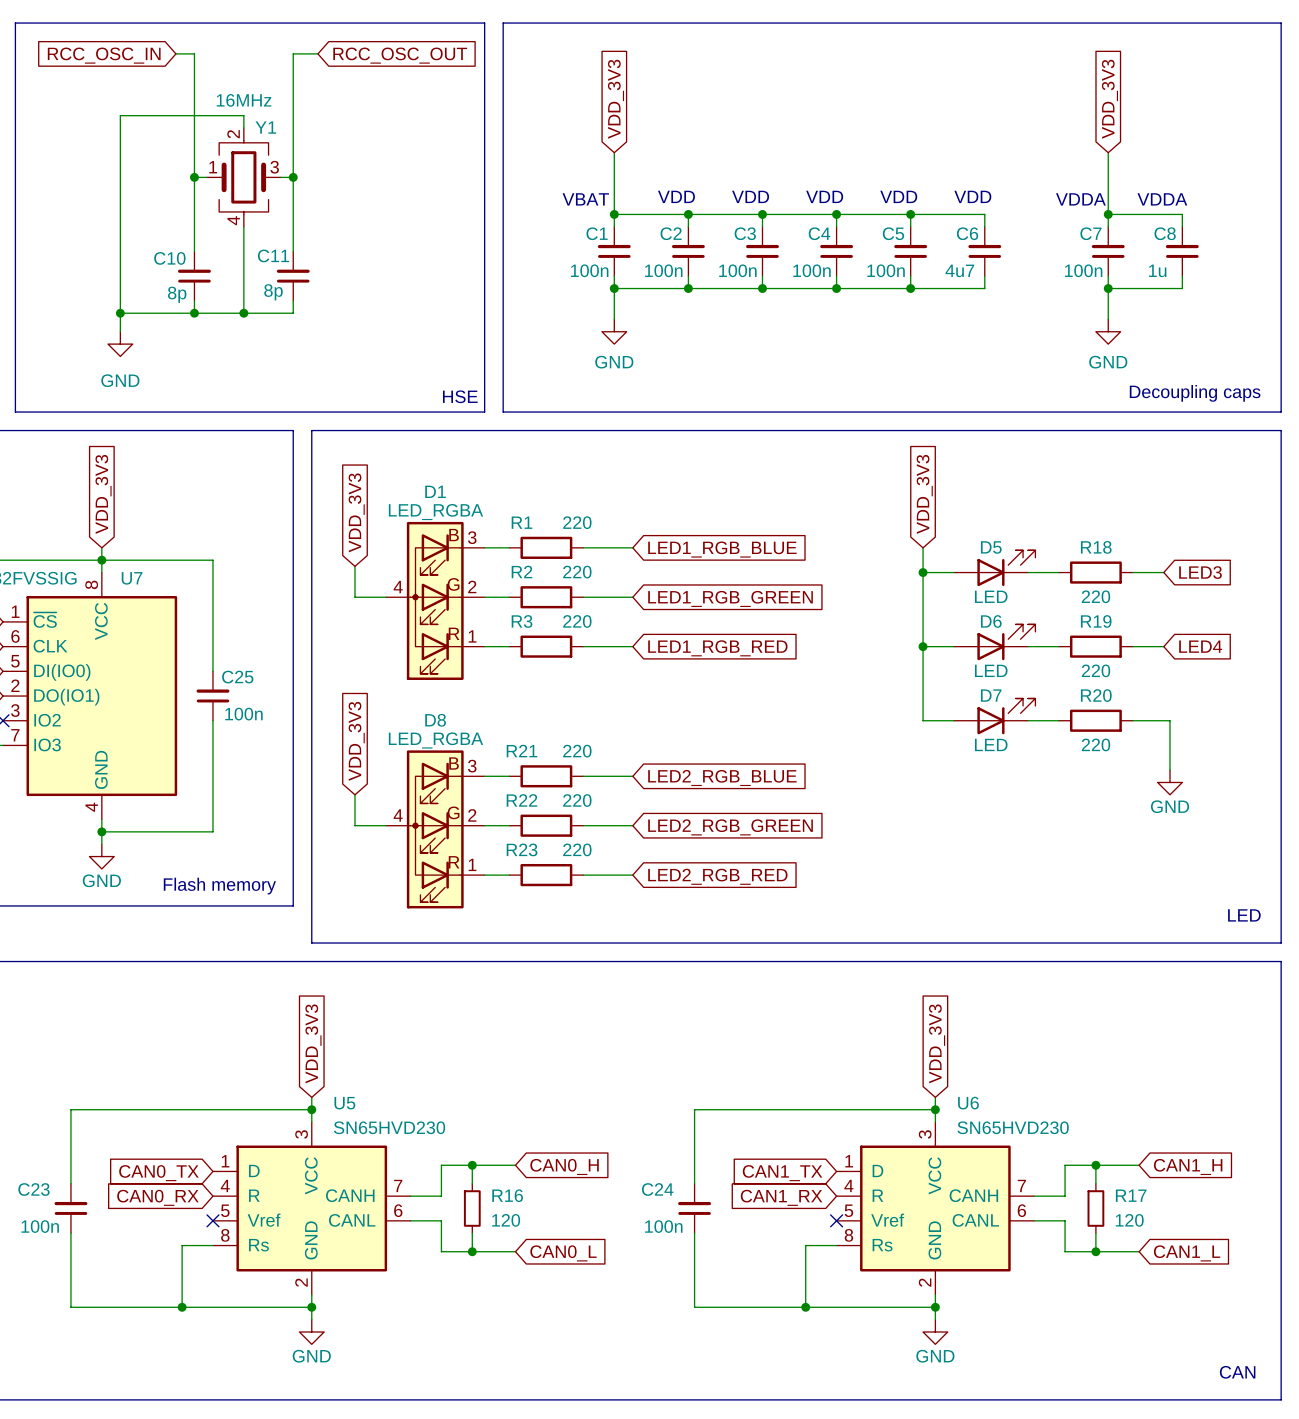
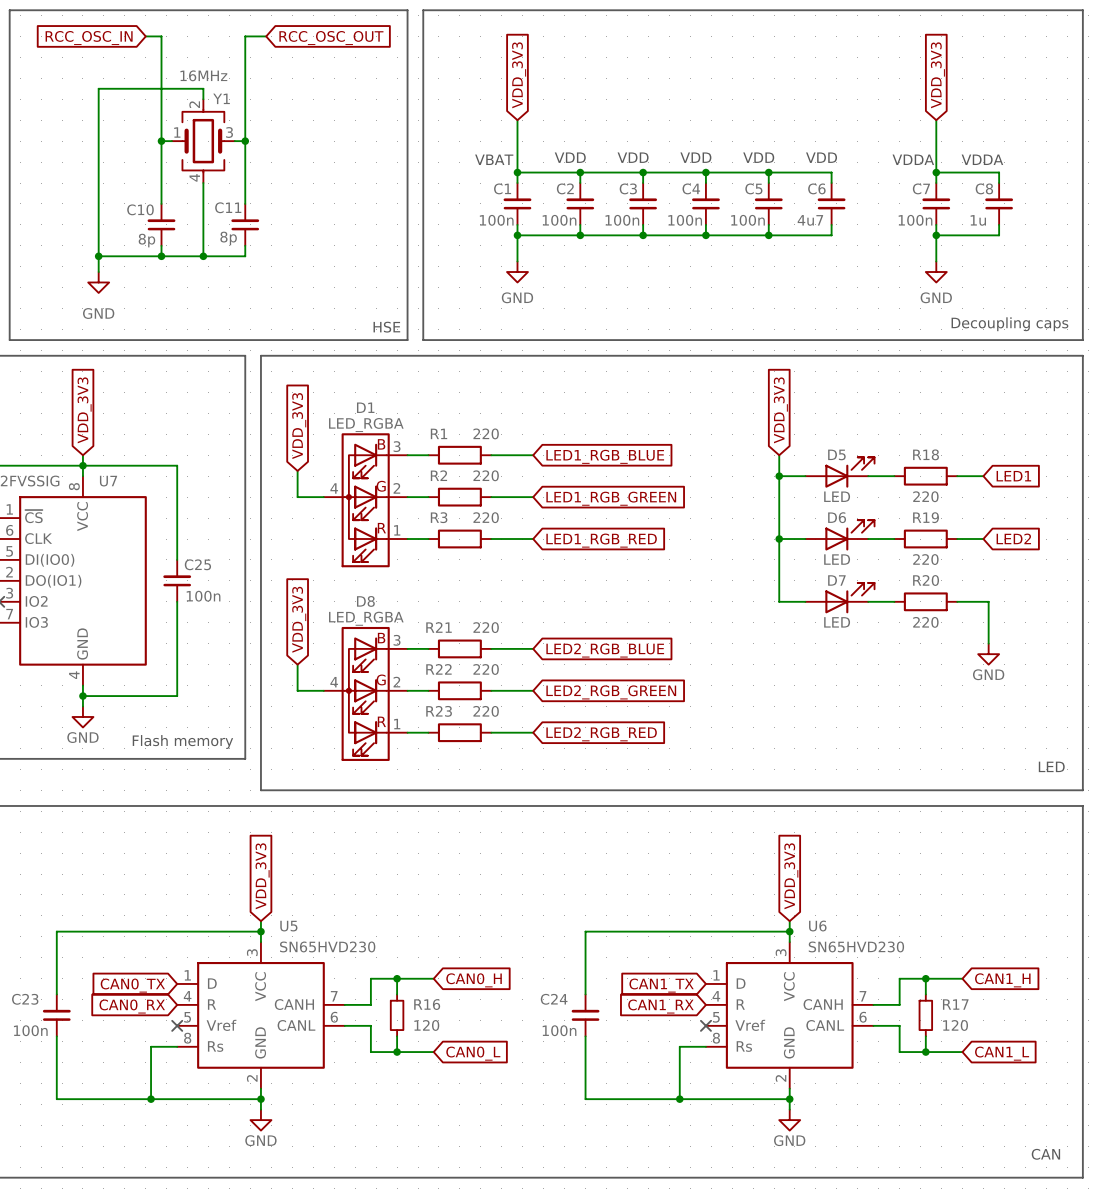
global label: LED3 (1200, 572) -> LED1 (1013, 476)
global label: LED4 (1200, 646) -> LED2 (1013, 538)

